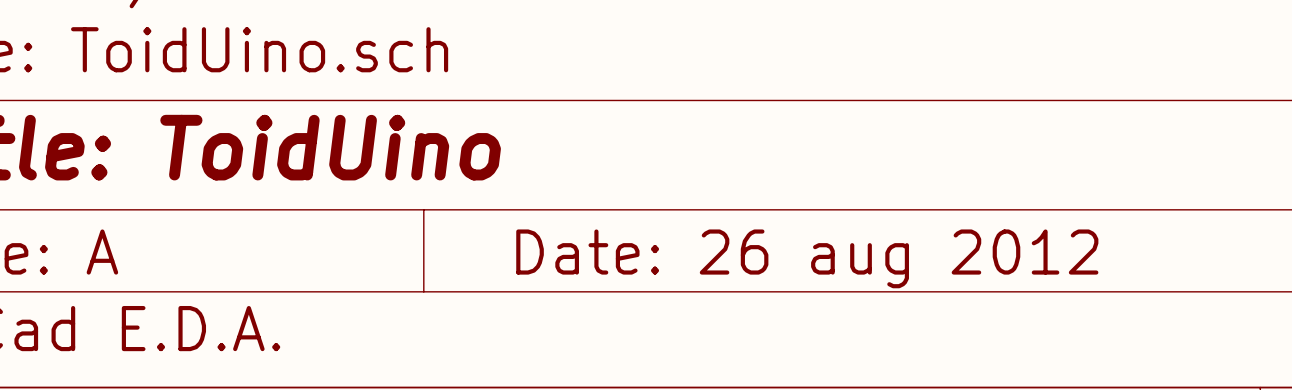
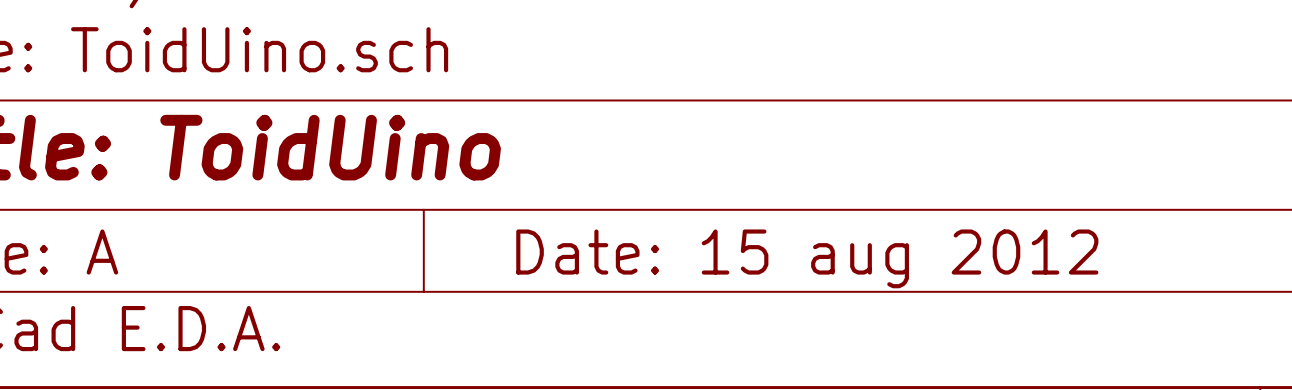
title block: Date: 26 aug 2012 (807, 258) -> Date: 15 aug 2012 (807, 258)

